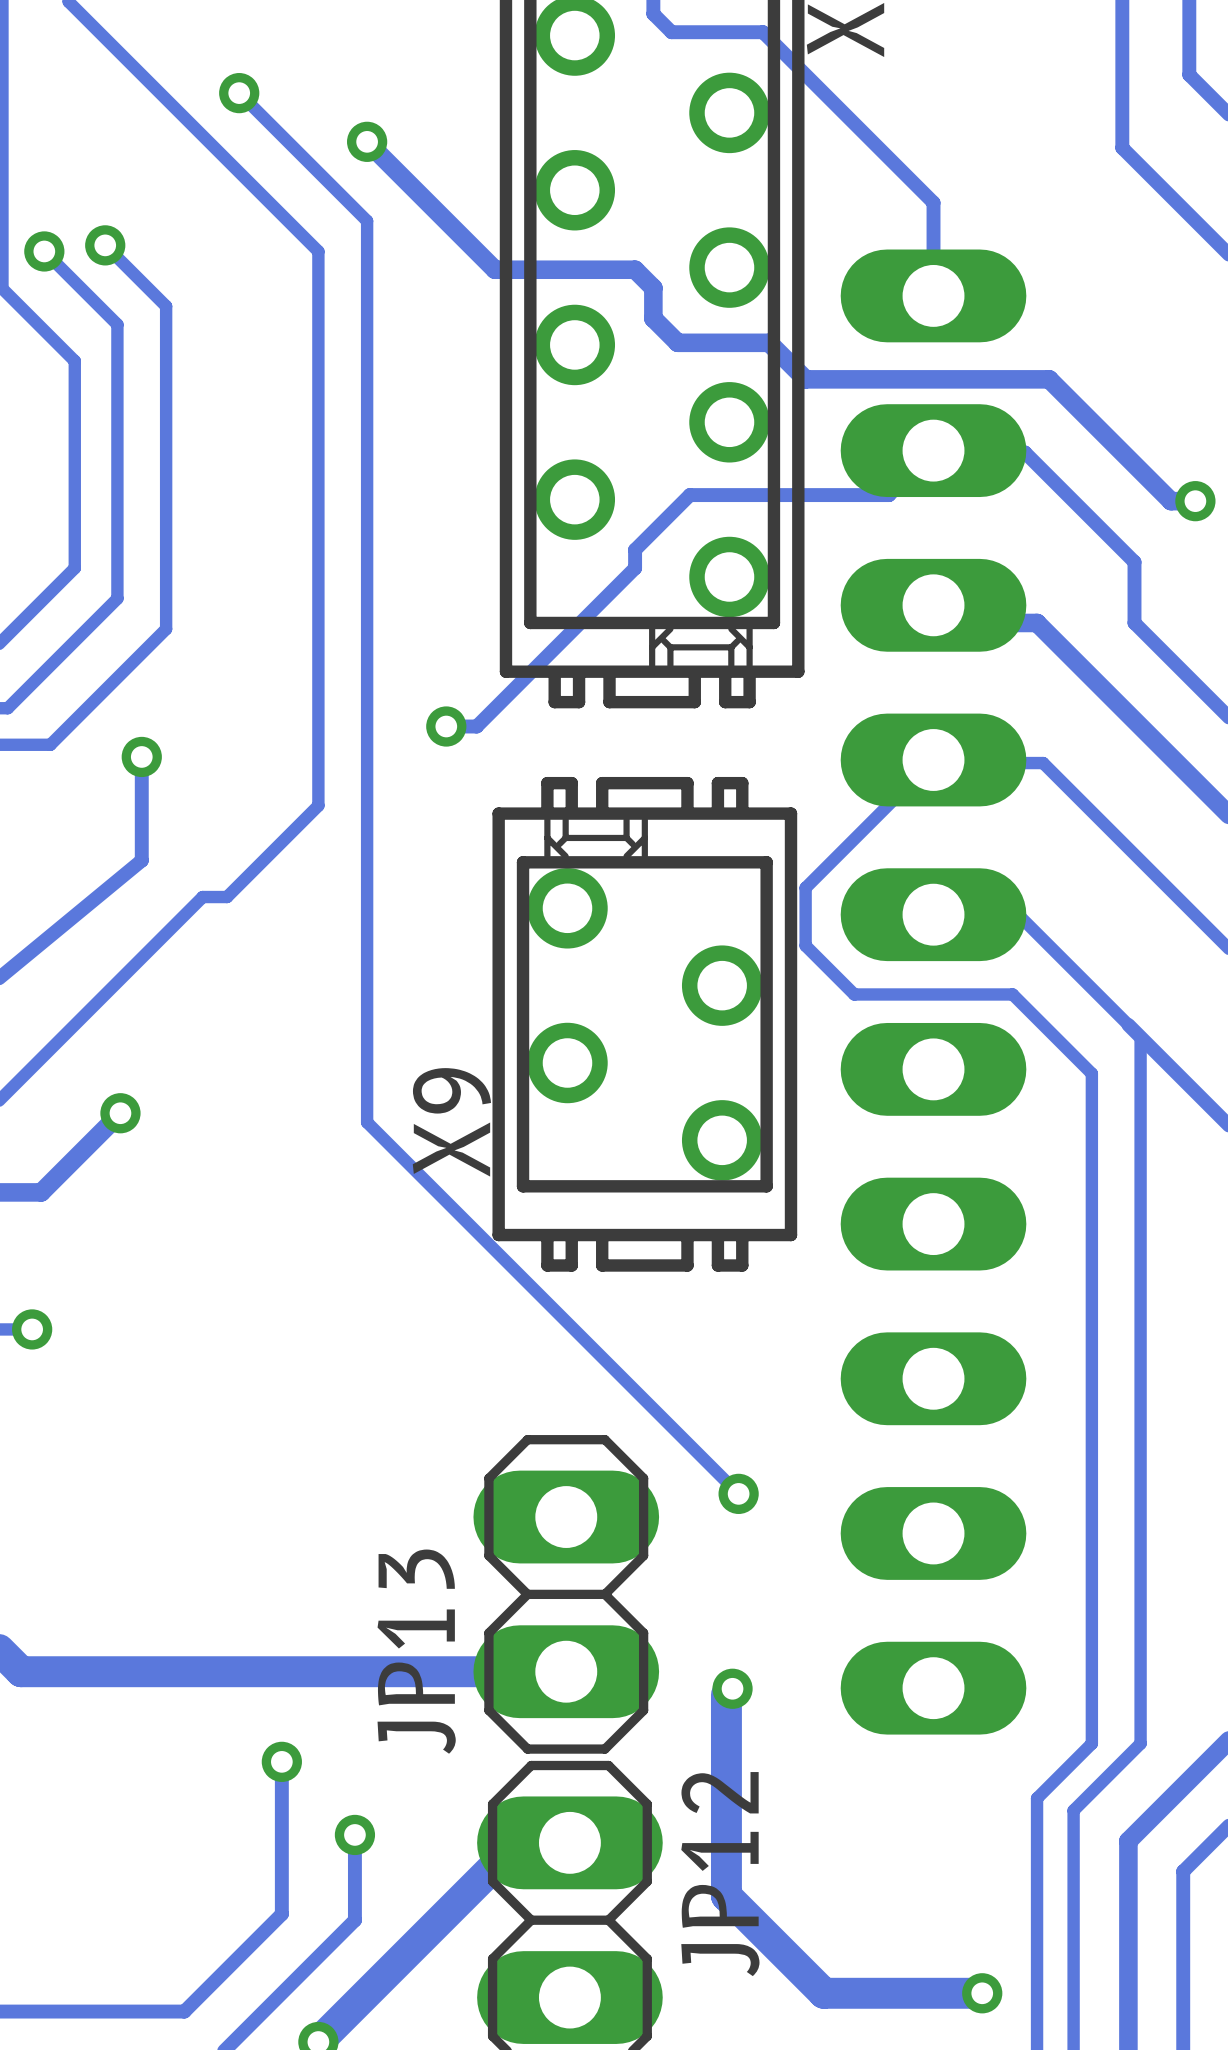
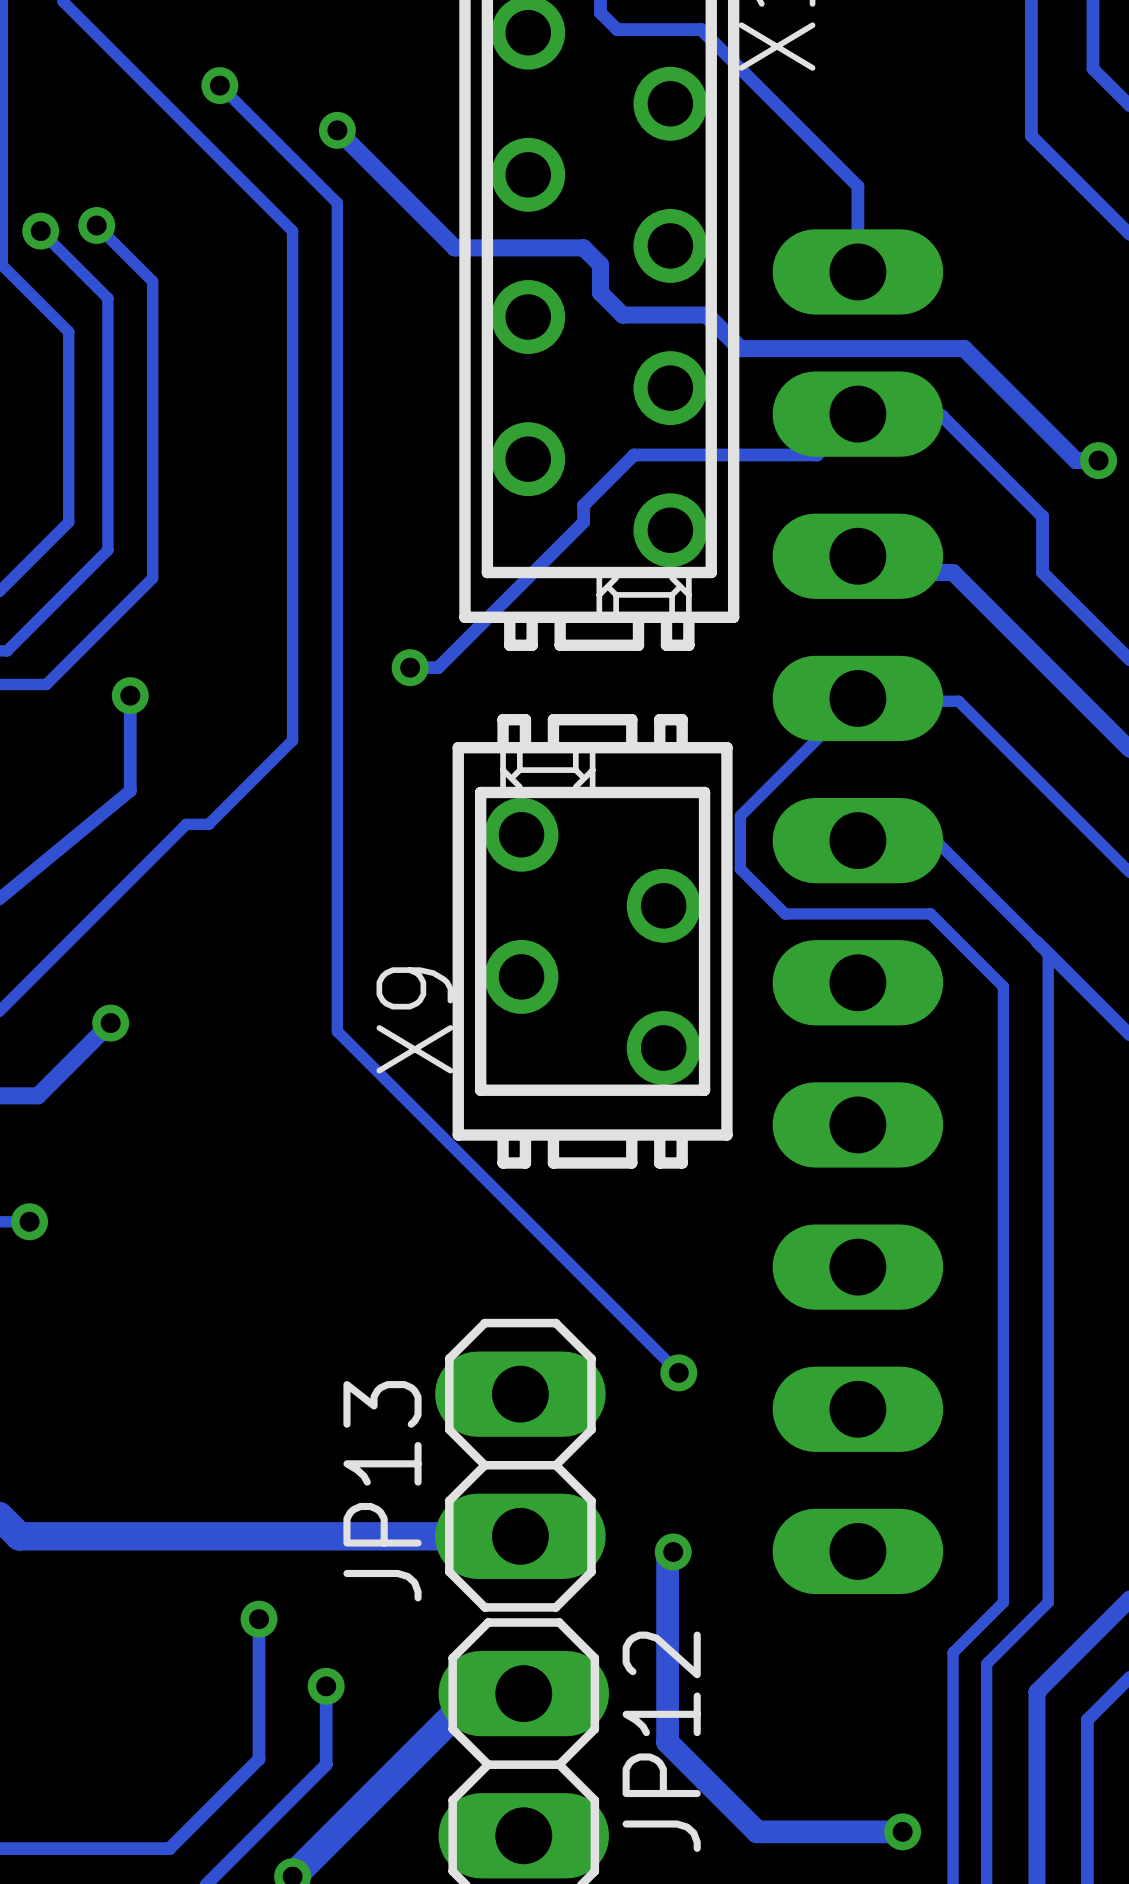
track width: thick (726, 1694) (726, 1895) (823, 1993) (982, 1993) -> thin (667, 1557) (667, 1742) (757, 1831) (902, 1831)

